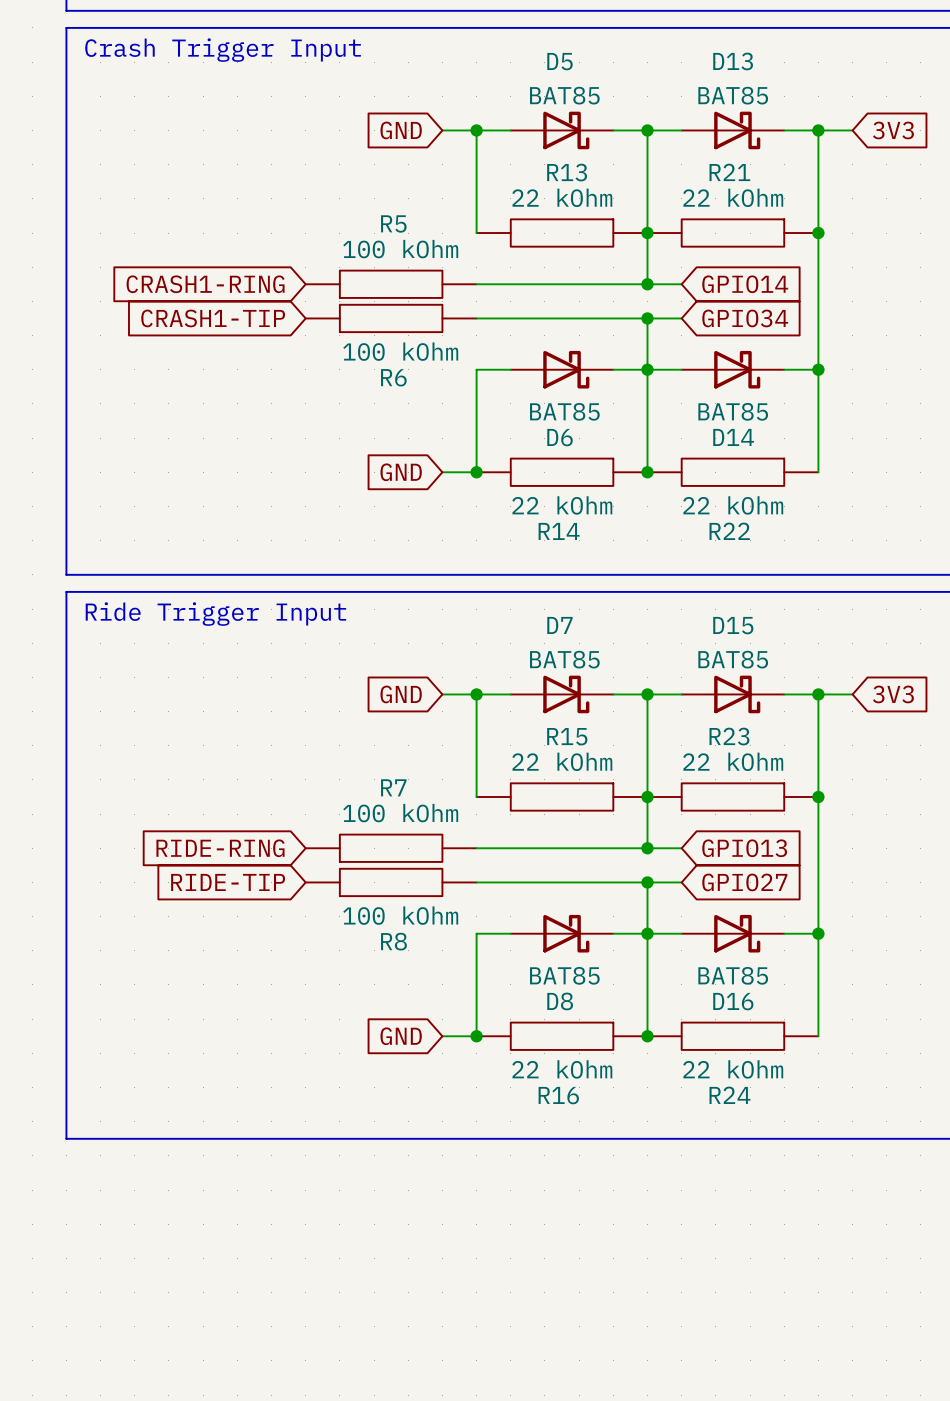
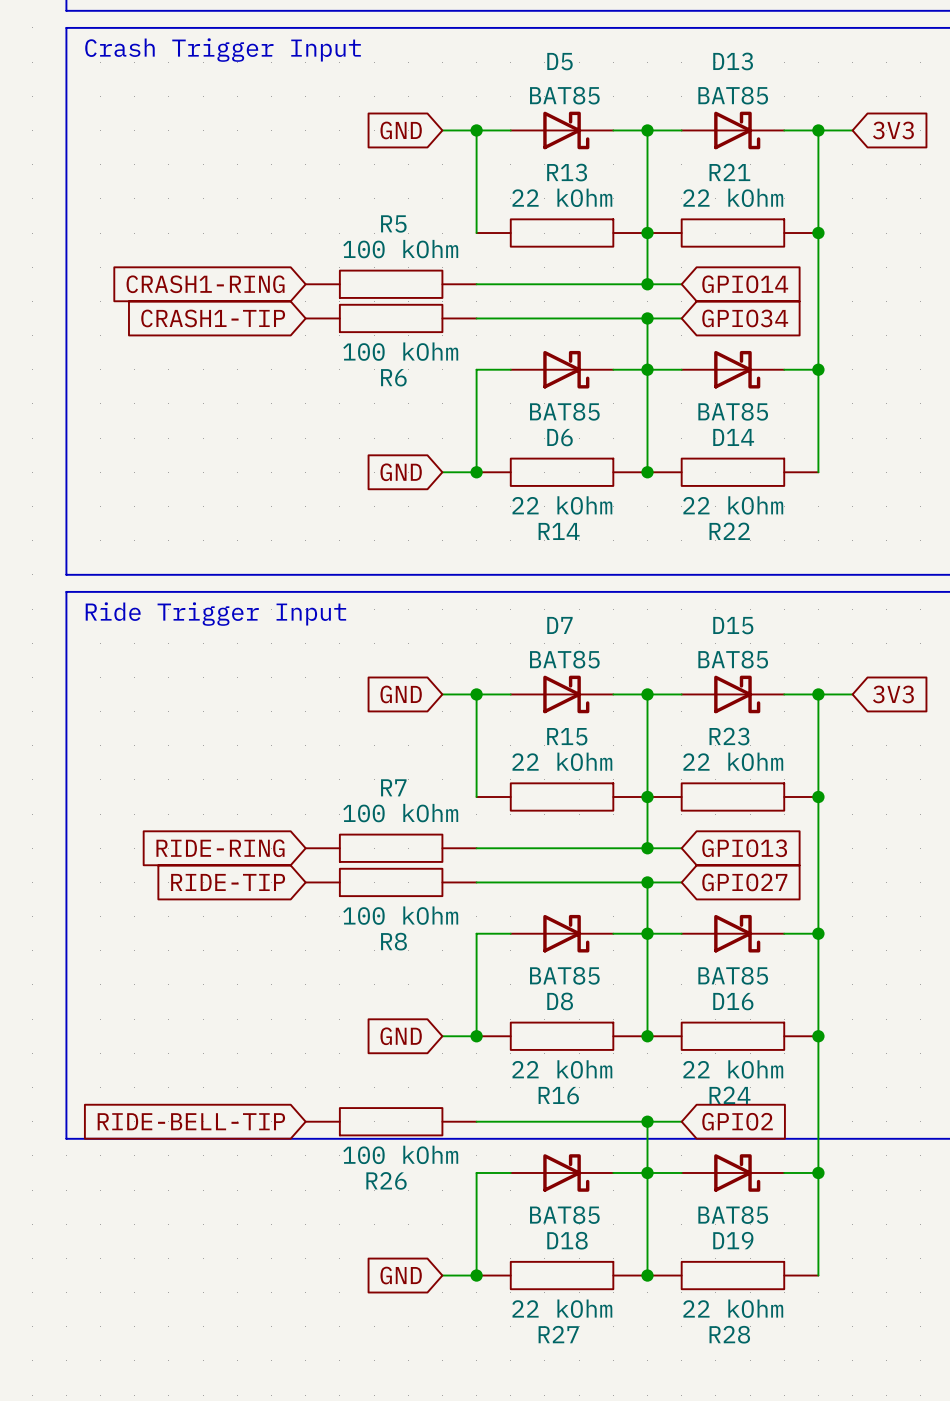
wire: none -> (818, 1036) (818, 1275)
junction: none -> (818, 1036)
global label: none -> RIDE-BELL-TIP (191, 1121)
R26: none -> 100 kOhm (391, 1121)
wire: none -> (476, 1121) (681, 1121)
wire: none -> (647, 1121) (647, 1275)
junction: none -> (647, 1121)
global label: none -> GPIO2 (737, 1121)
wire: none -> (510, 1172) (476, 1172) (476, 1275) (442, 1275)
D18: none -> BAT85 (562, 1172)
wire: none -> (613, 1172) (681, 1172)
junction: none -> (647, 1172)
D19: none -> BAT85 (732, 1172)
wire: none -> (784, 1172) (818, 1172)
junction: none -> (818, 1172)
global label: none -> GND (401, 1275)
junction: none -> (476, 1275)
R27: none -> 22 kOhm (562, 1275)
junction: none -> (647, 1275)
R28: none -> 22 kOhm (732, 1275)

